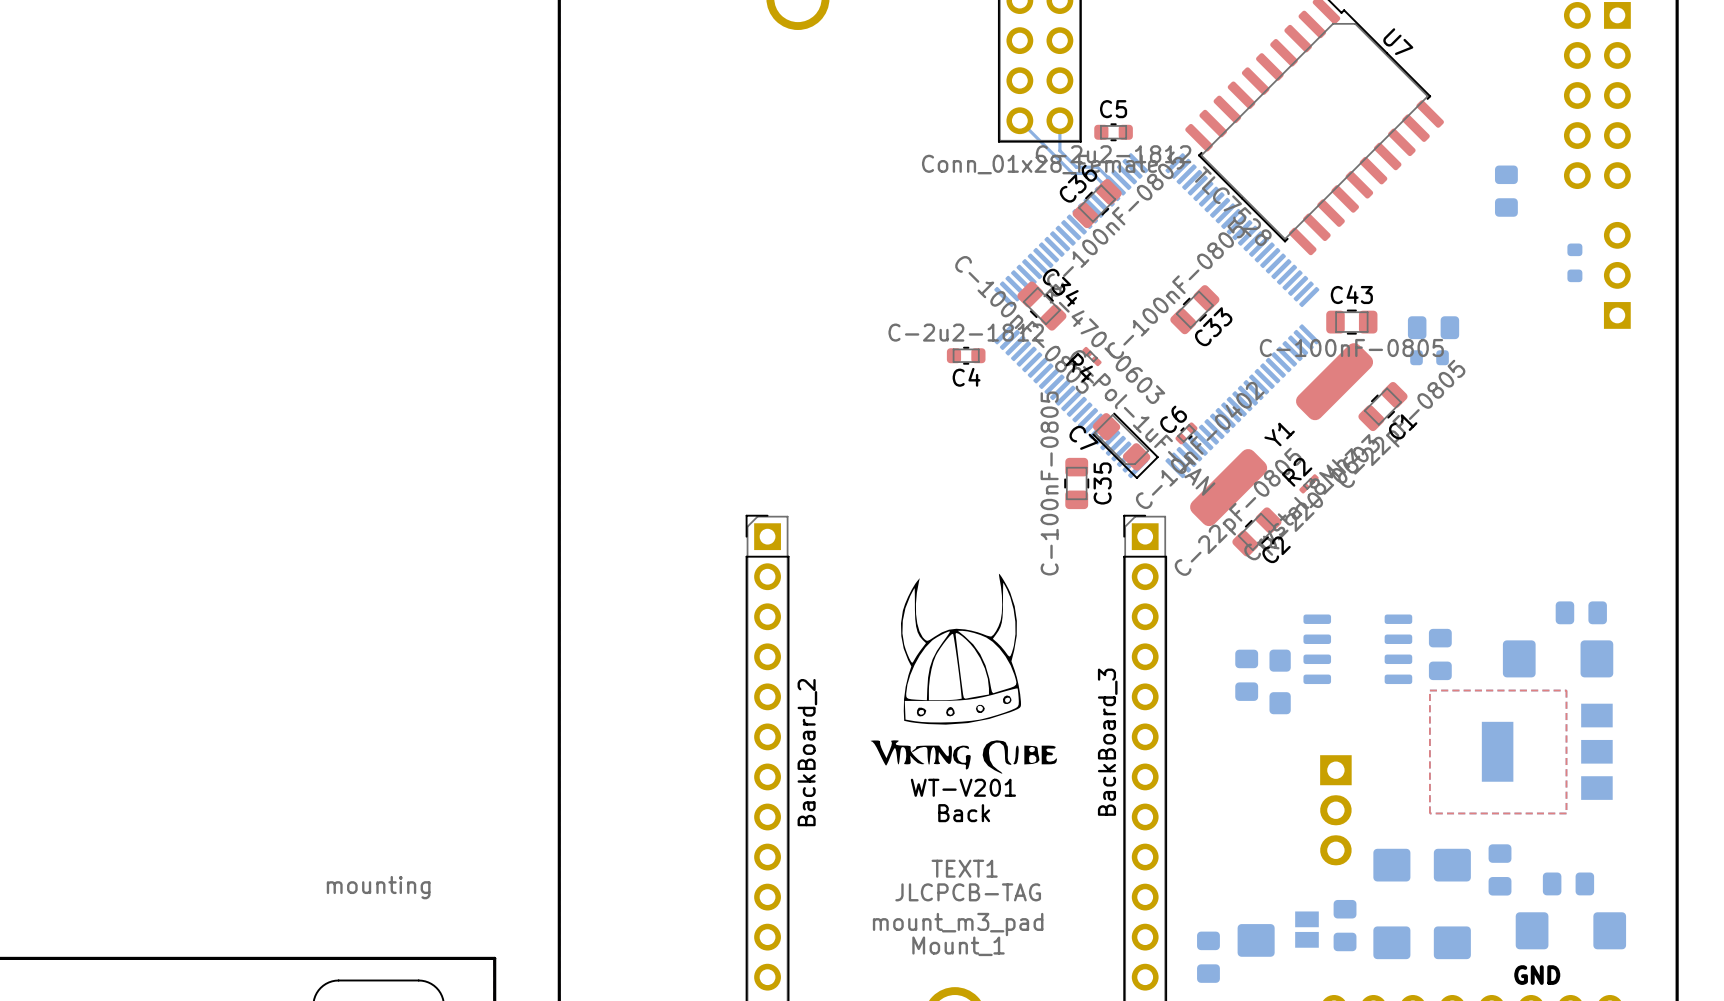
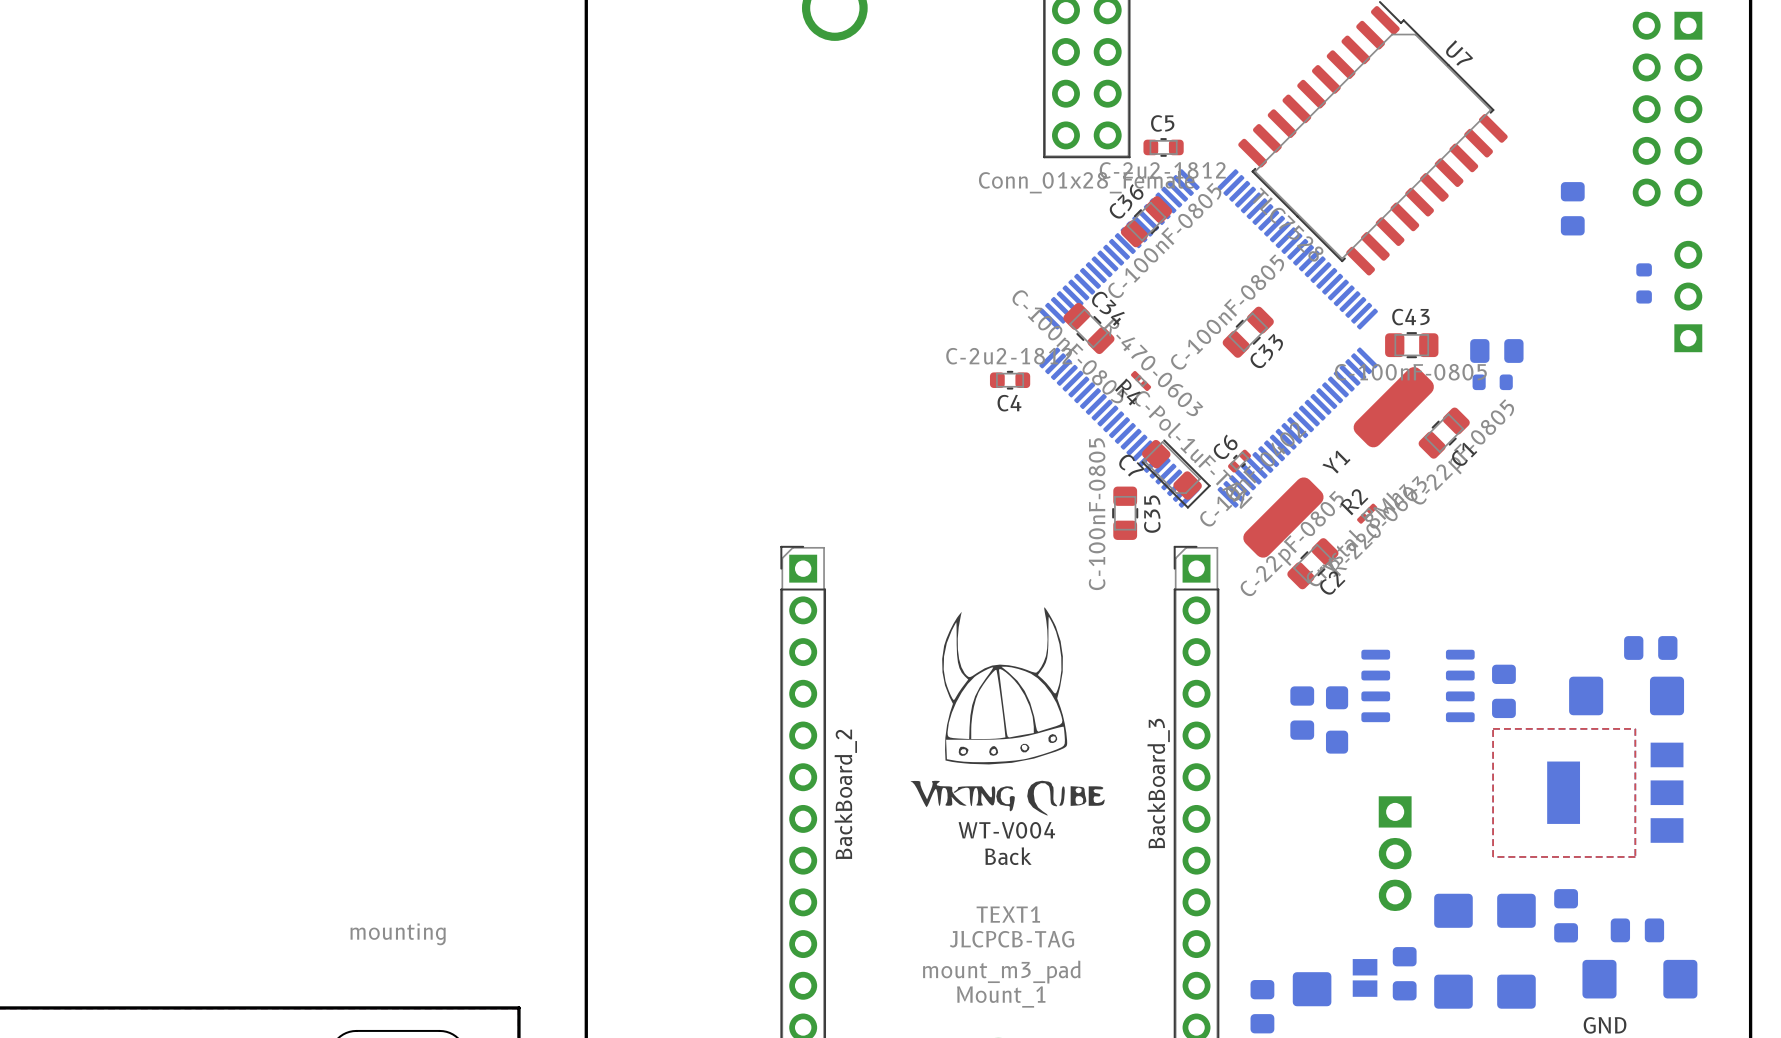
bottom track: (1019, 120) (1072, 173) (1092, 173) (1110, 191) -> none
bottom track: (1059, 120) (1059, 150) (1076, 167) (1097, 167) (1115, 185) -> none
text: WT-V201 (963, 787) -> WT-V004 (1006, 830)

